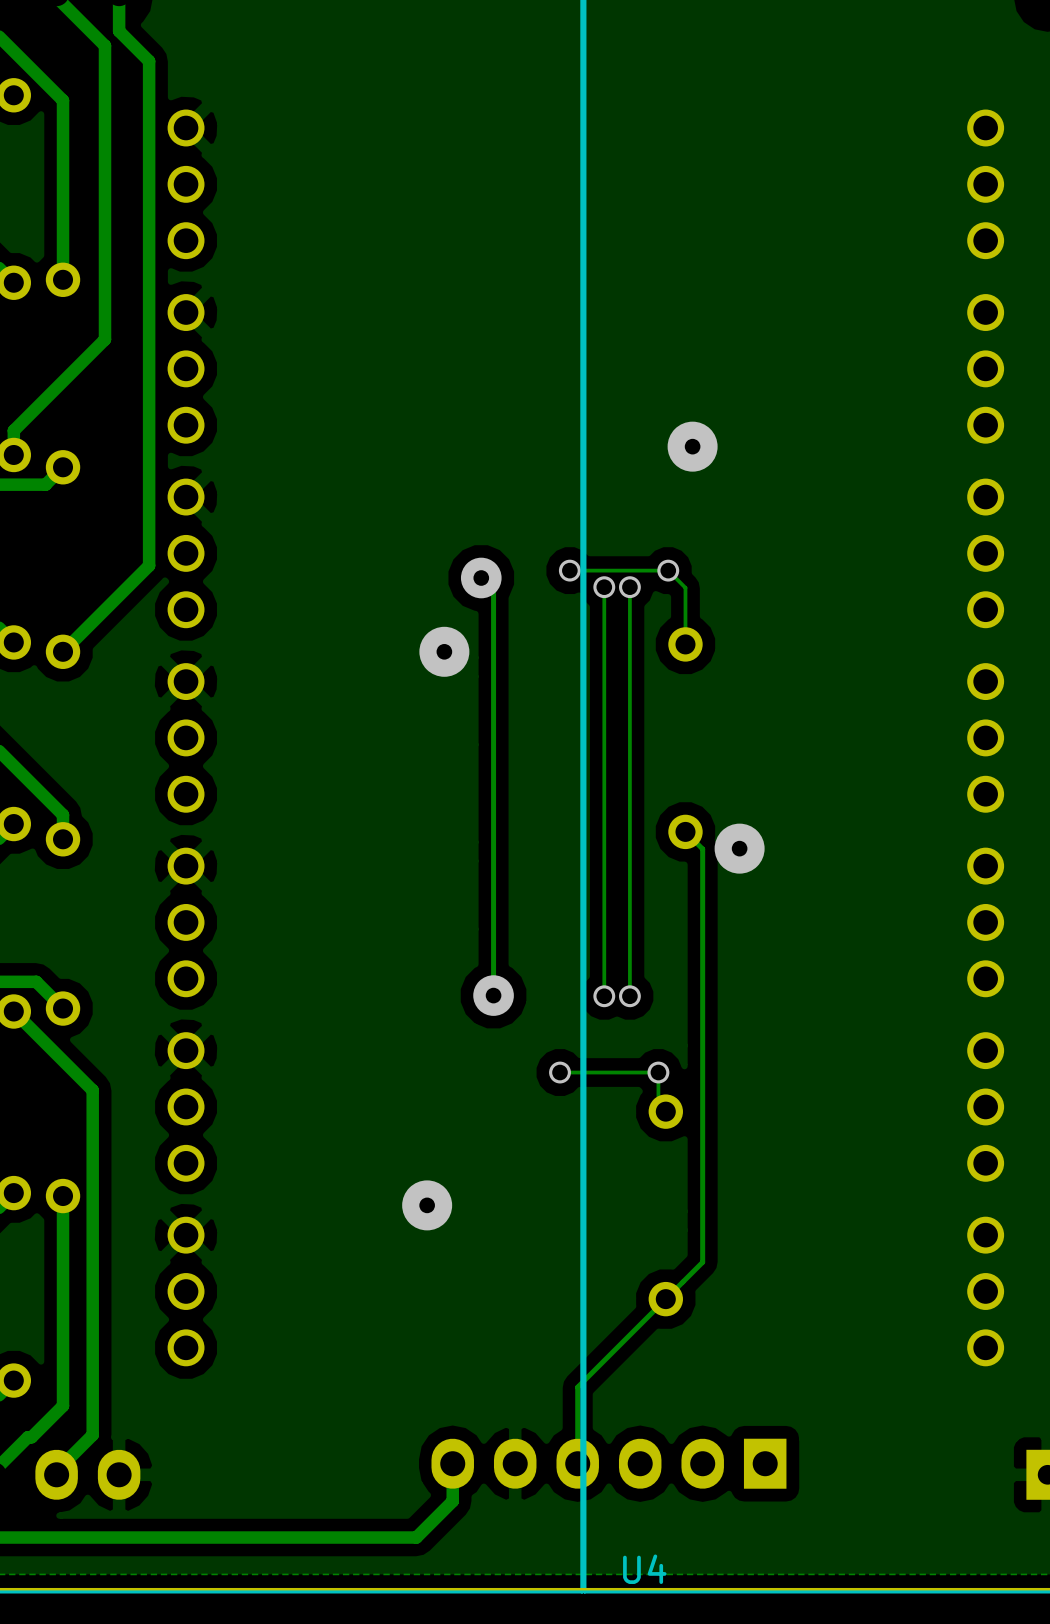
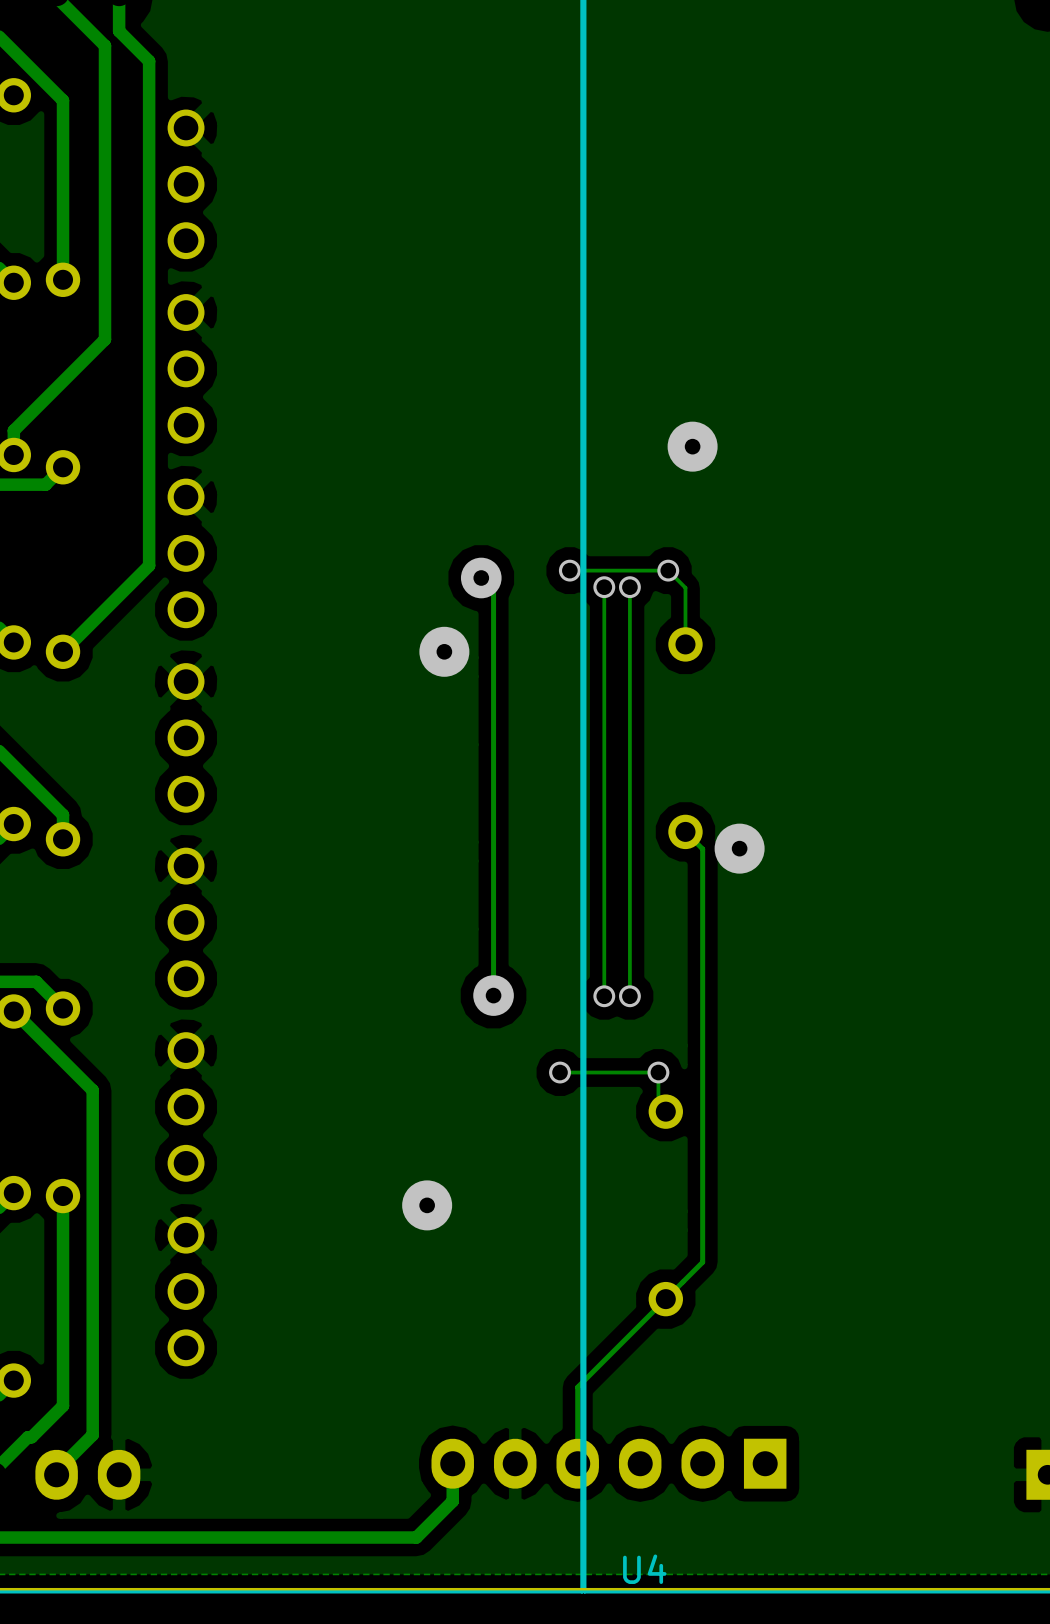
part: (985, 184) -> none
part: (985, 368) -> none
part: (985, 553) -> none
part: (985, 737) -> none
part: (985, 922) -> none
part: (985, 1106) -> none
part: (985, 1291) -> none

